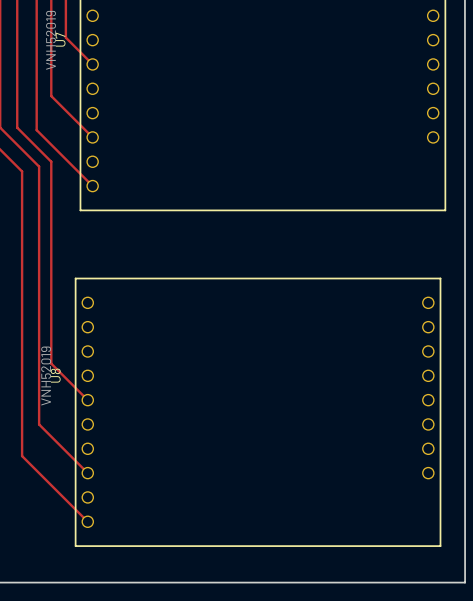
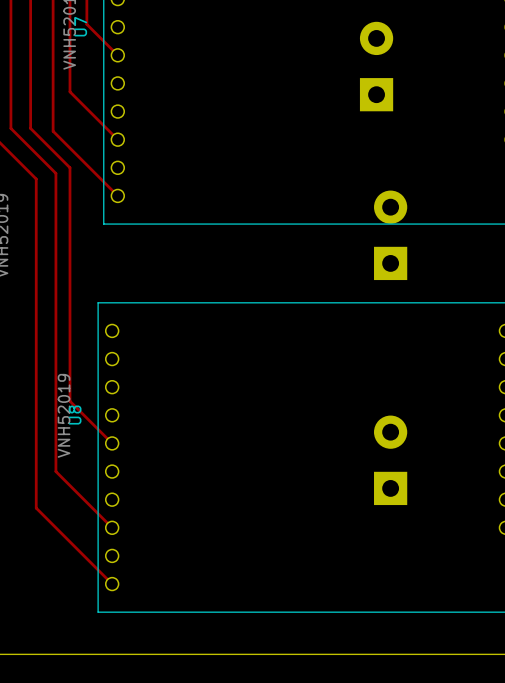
part: none -> (376, 66)
part: none -> (390, 235)
part: none -> (390, 460)

